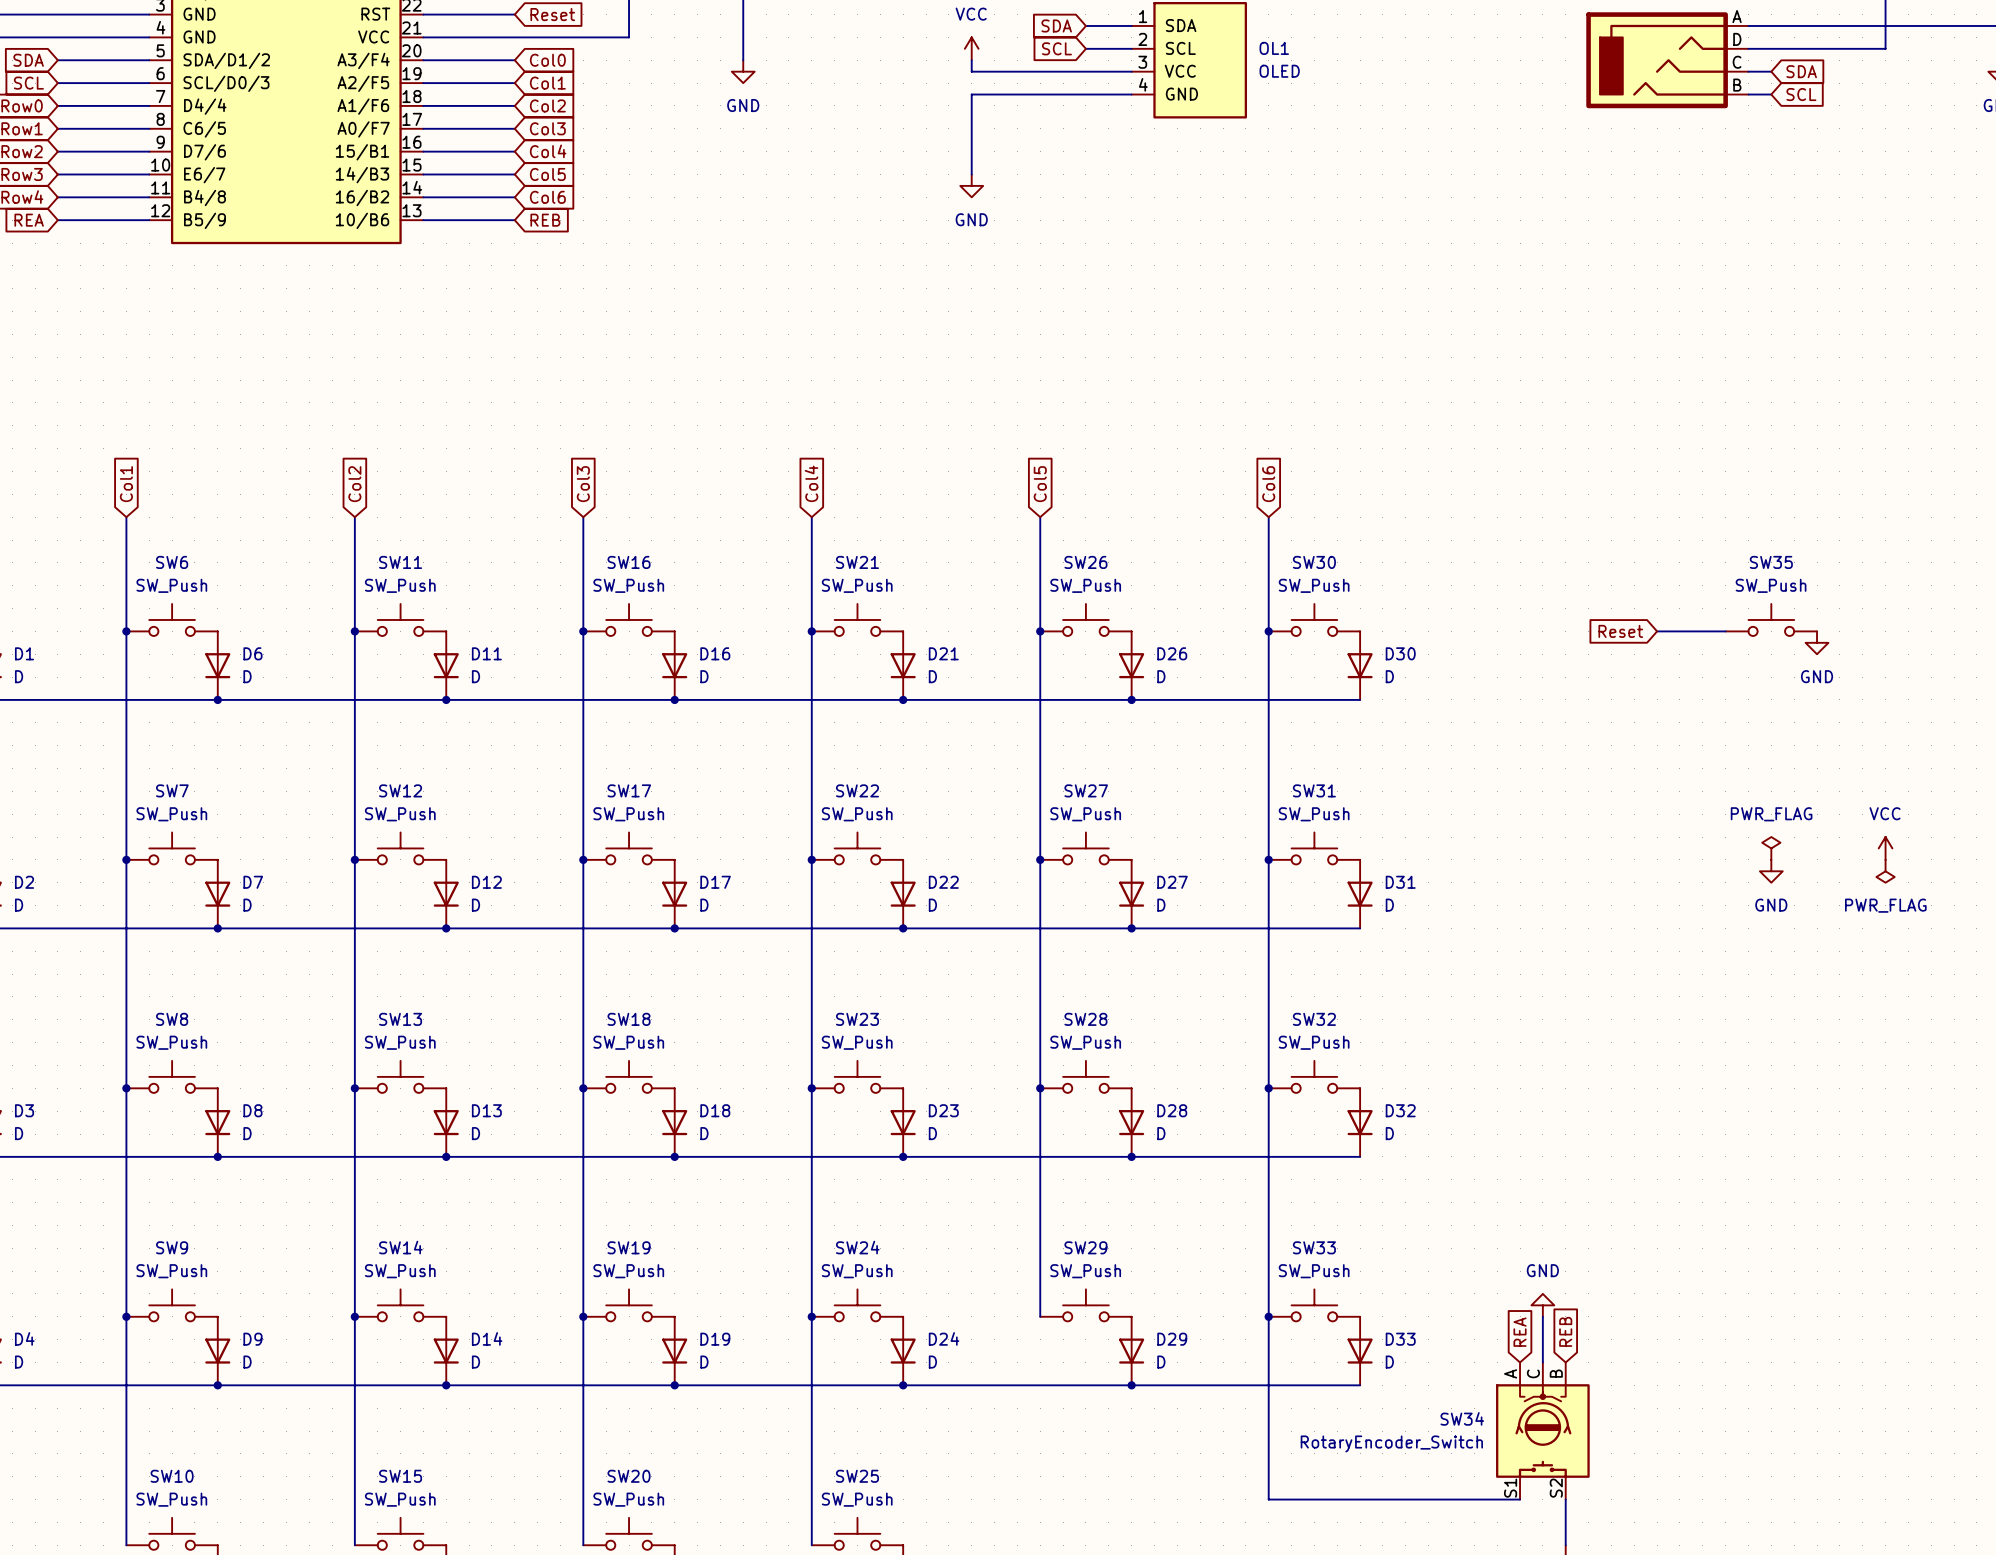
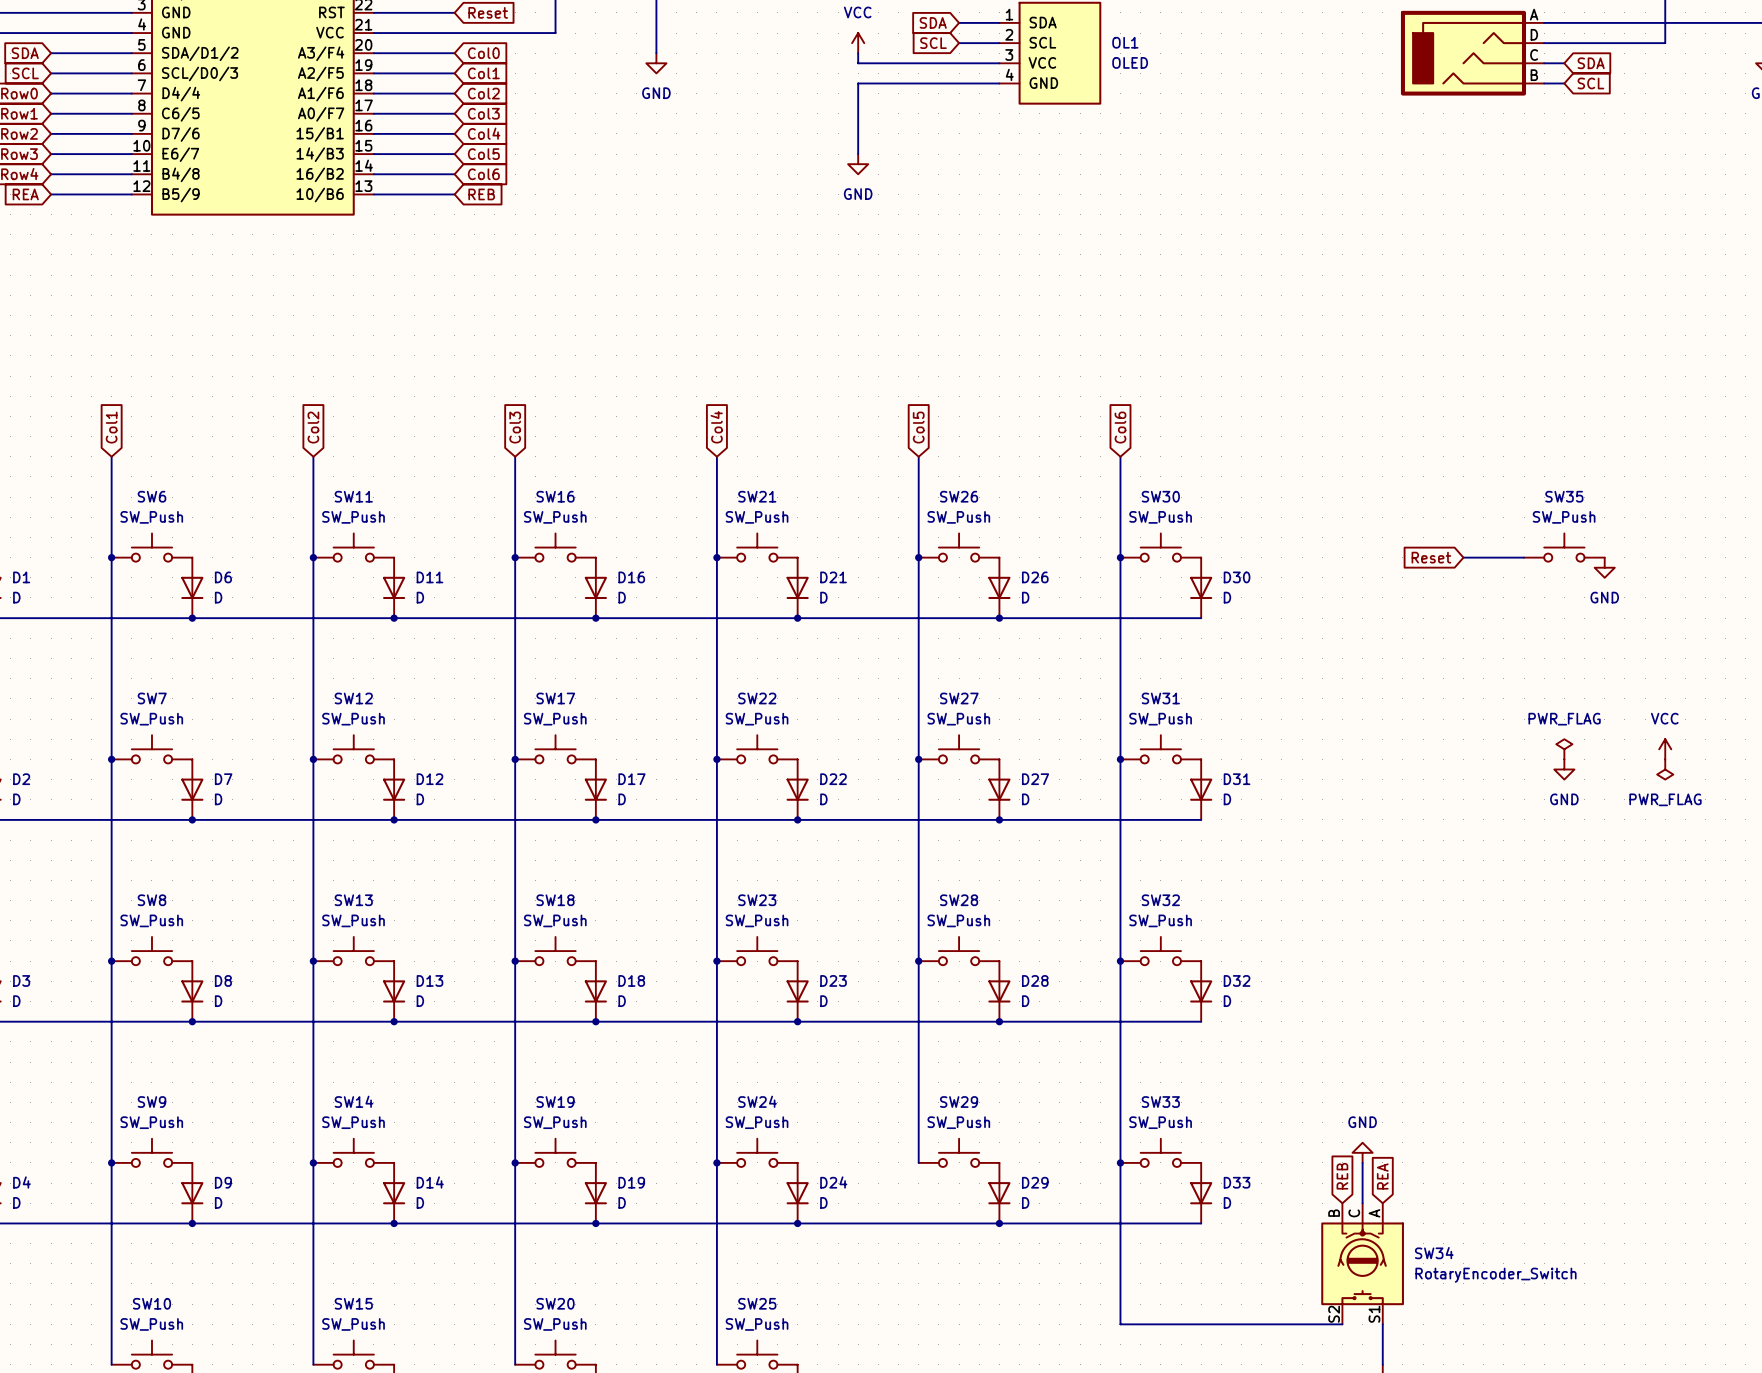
global label: REB (1565, 1331) -> REA (1382, 1176)
global label: REA (1520, 1332) -> REB (1342, 1176)
SW34 flip: as is (1542, 1431) -> left-right (1362, 1263)

